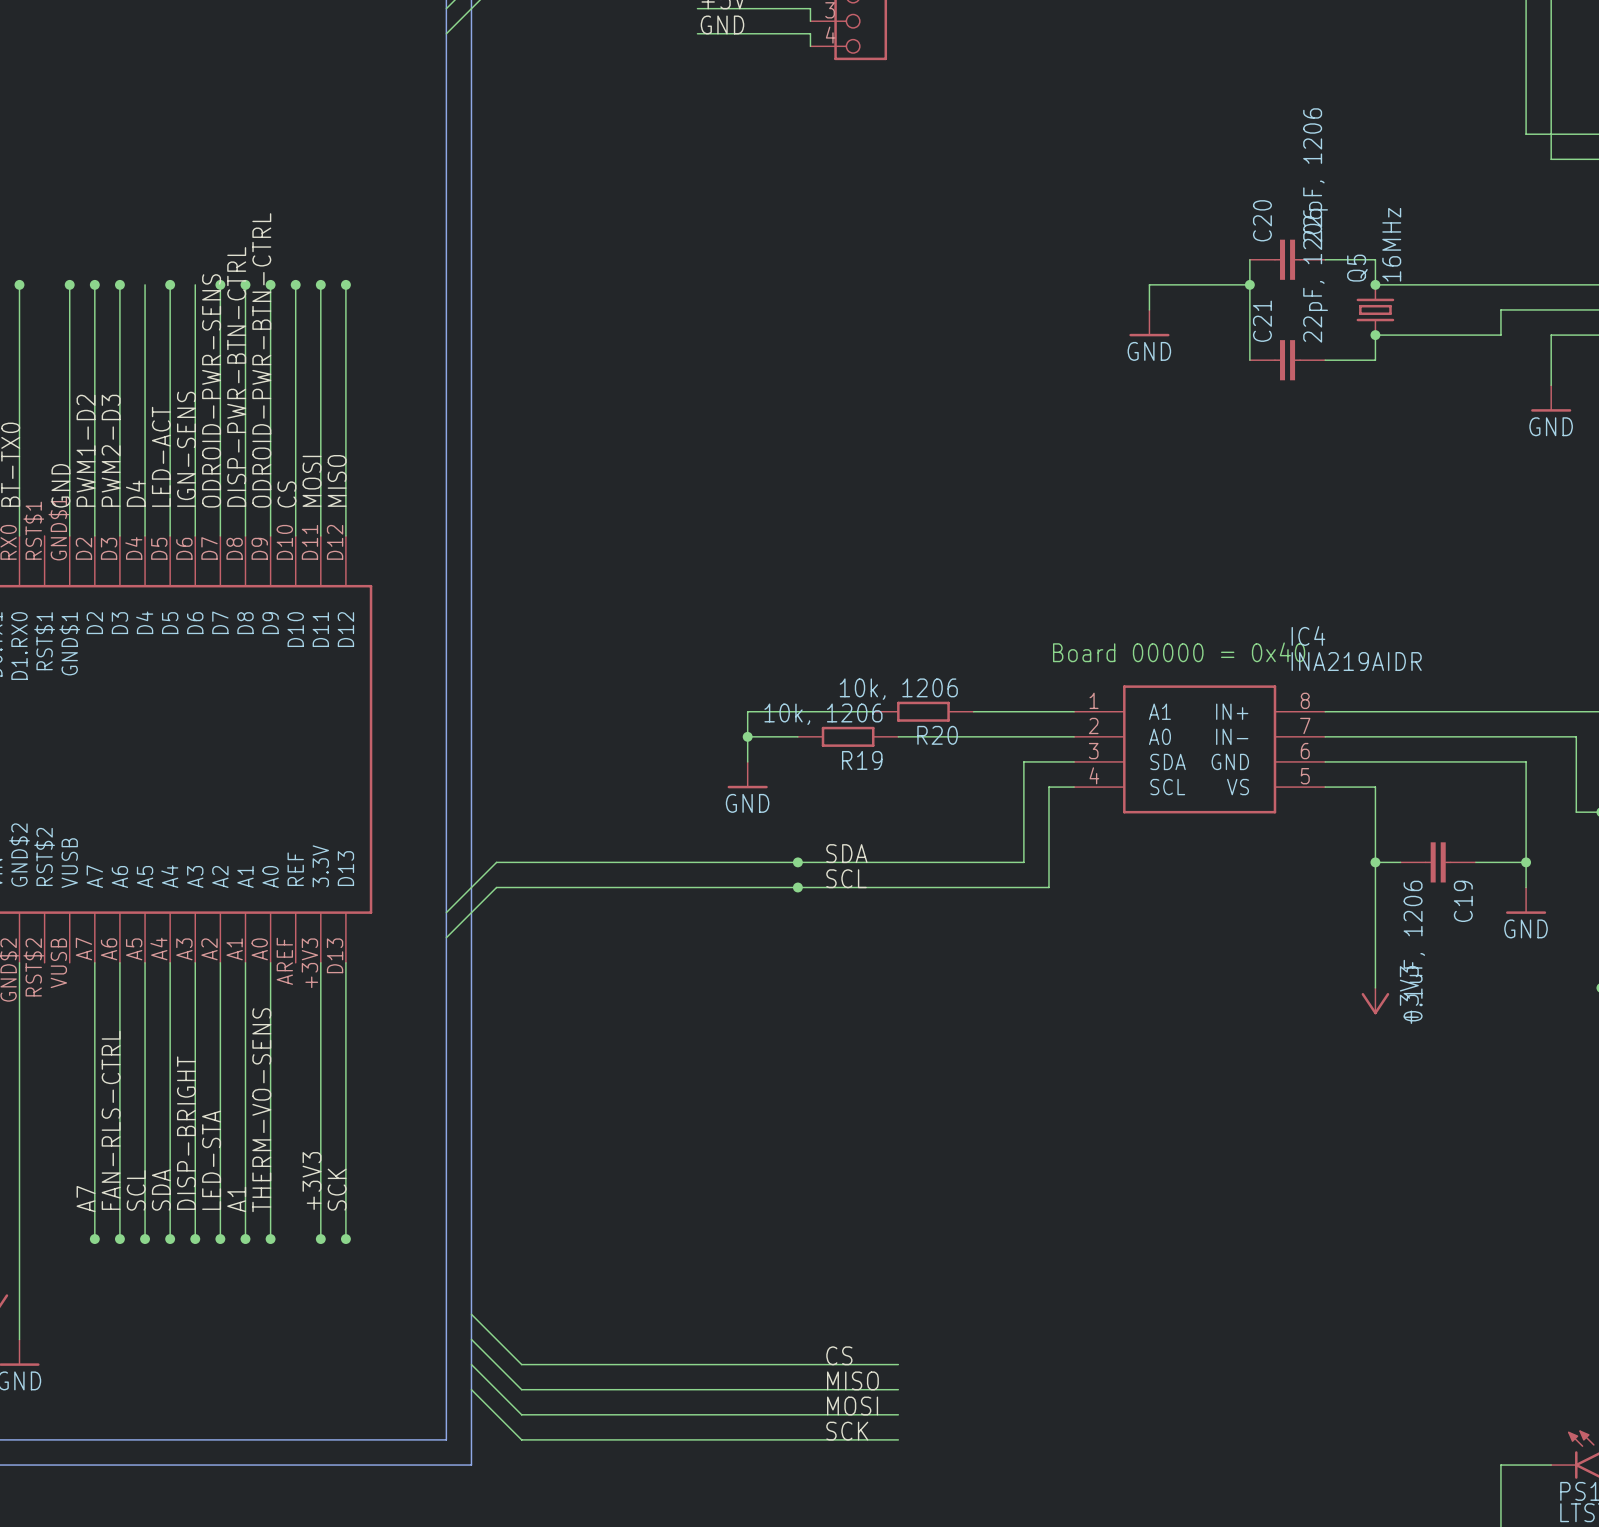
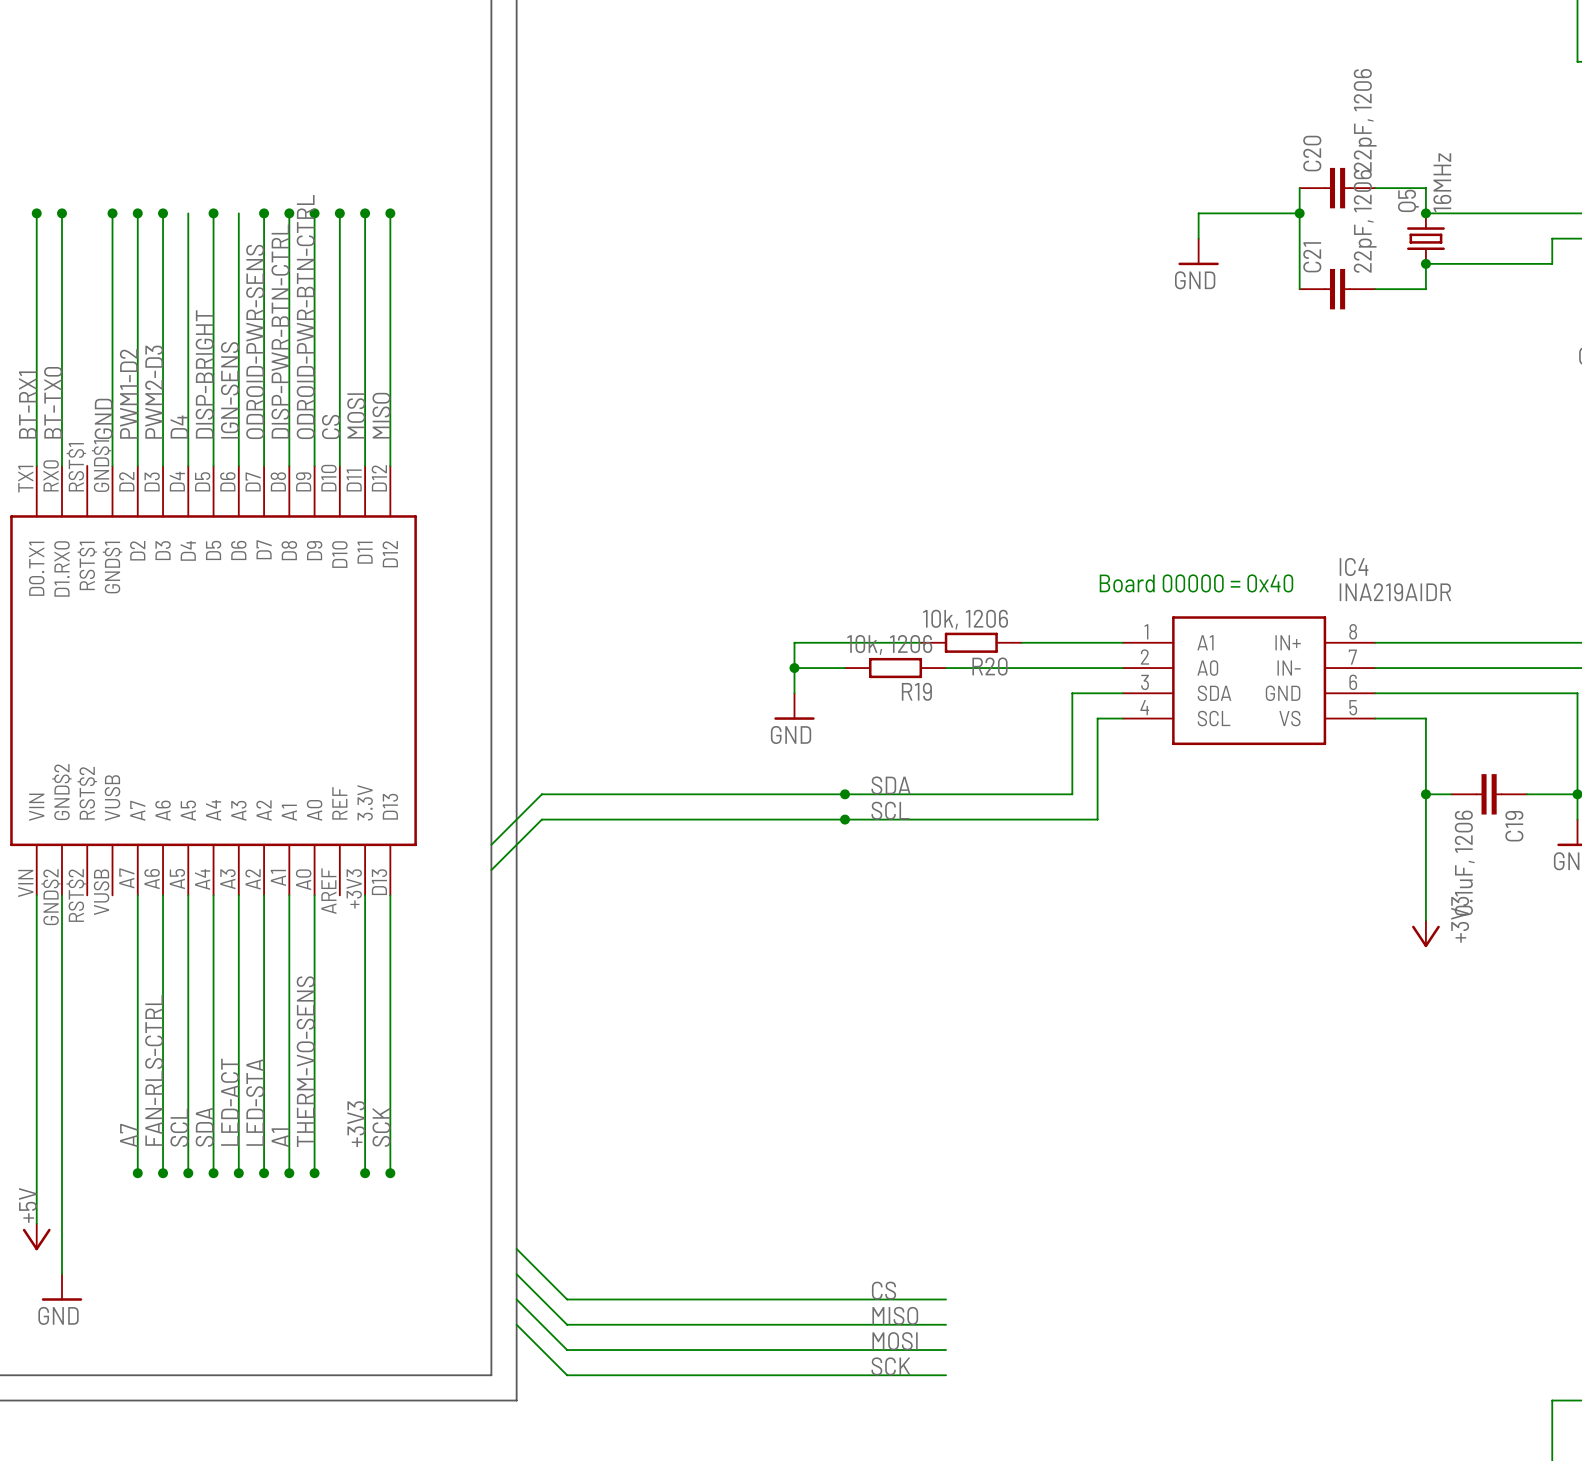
label: LED-ACT (161, 456) -> DISP-BRIGHT (204, 374)
label: DISP-BRIGHT (186, 1133) -> LED-ACT (229, 1102)

